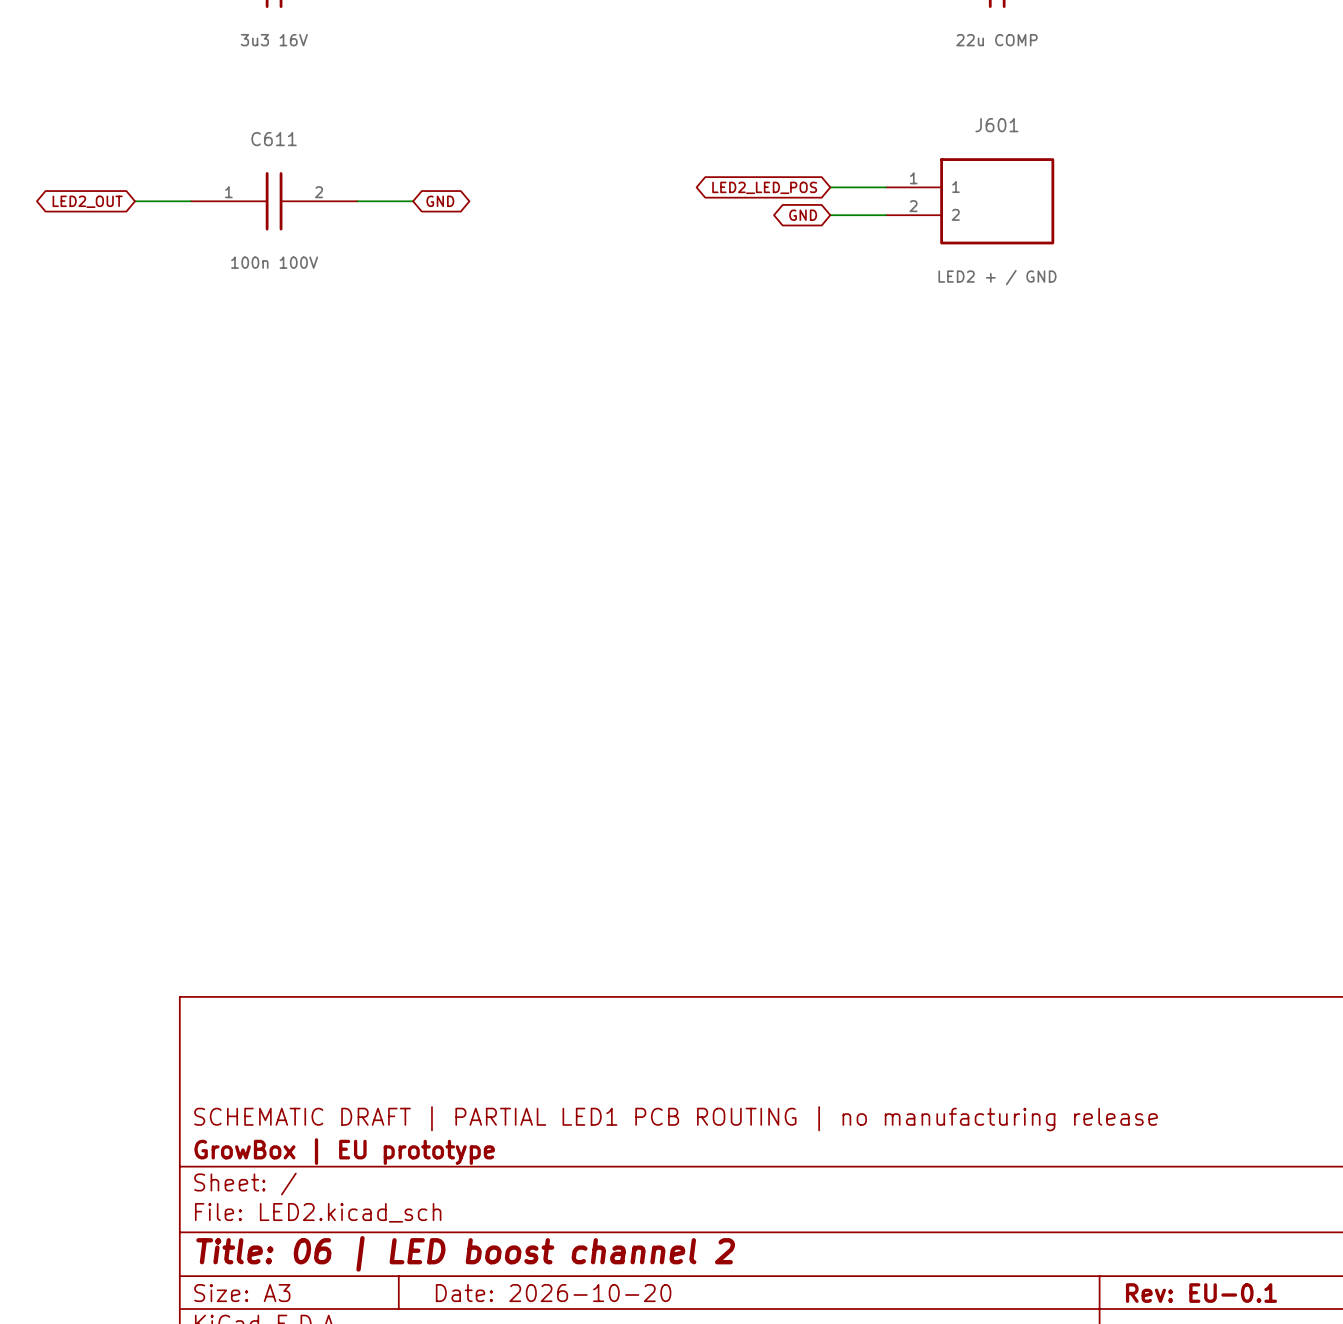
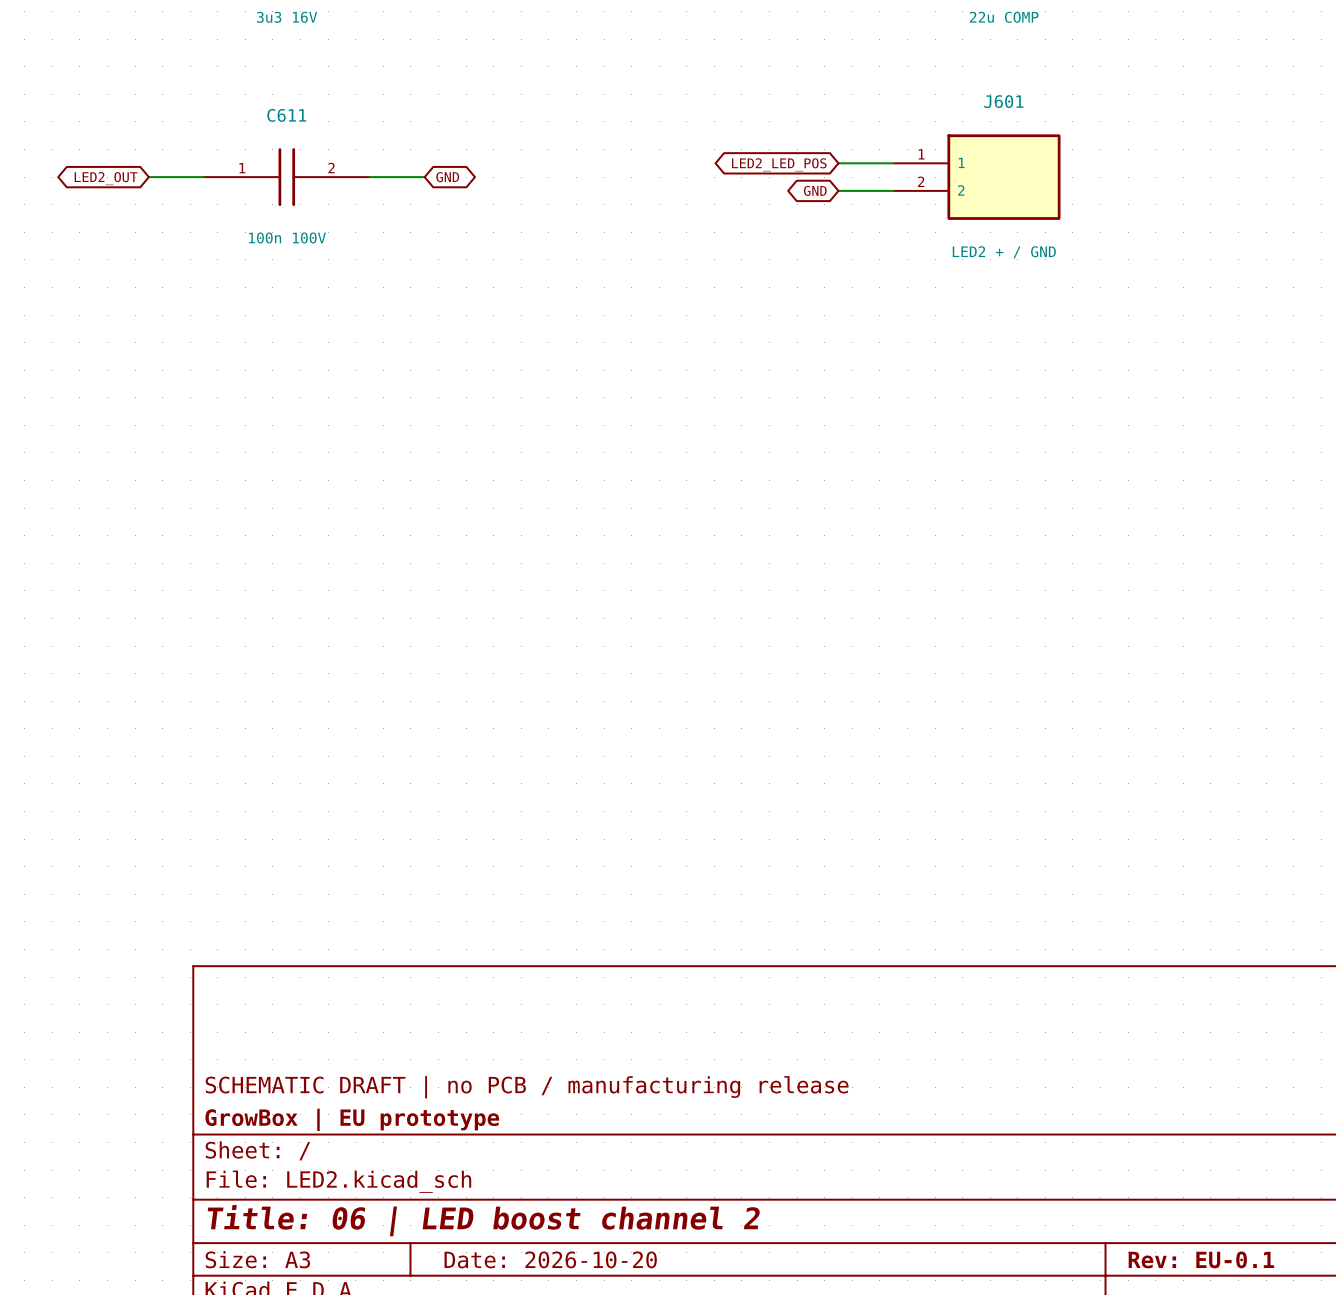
title block: SCHEMATIC DRAFT | PARTIAL LED1 PCB ROUTING | no manufacturing release (676, 1118) -> SCHEMATIC DRAFT | no PCB / manufacturing release (527, 1087)

